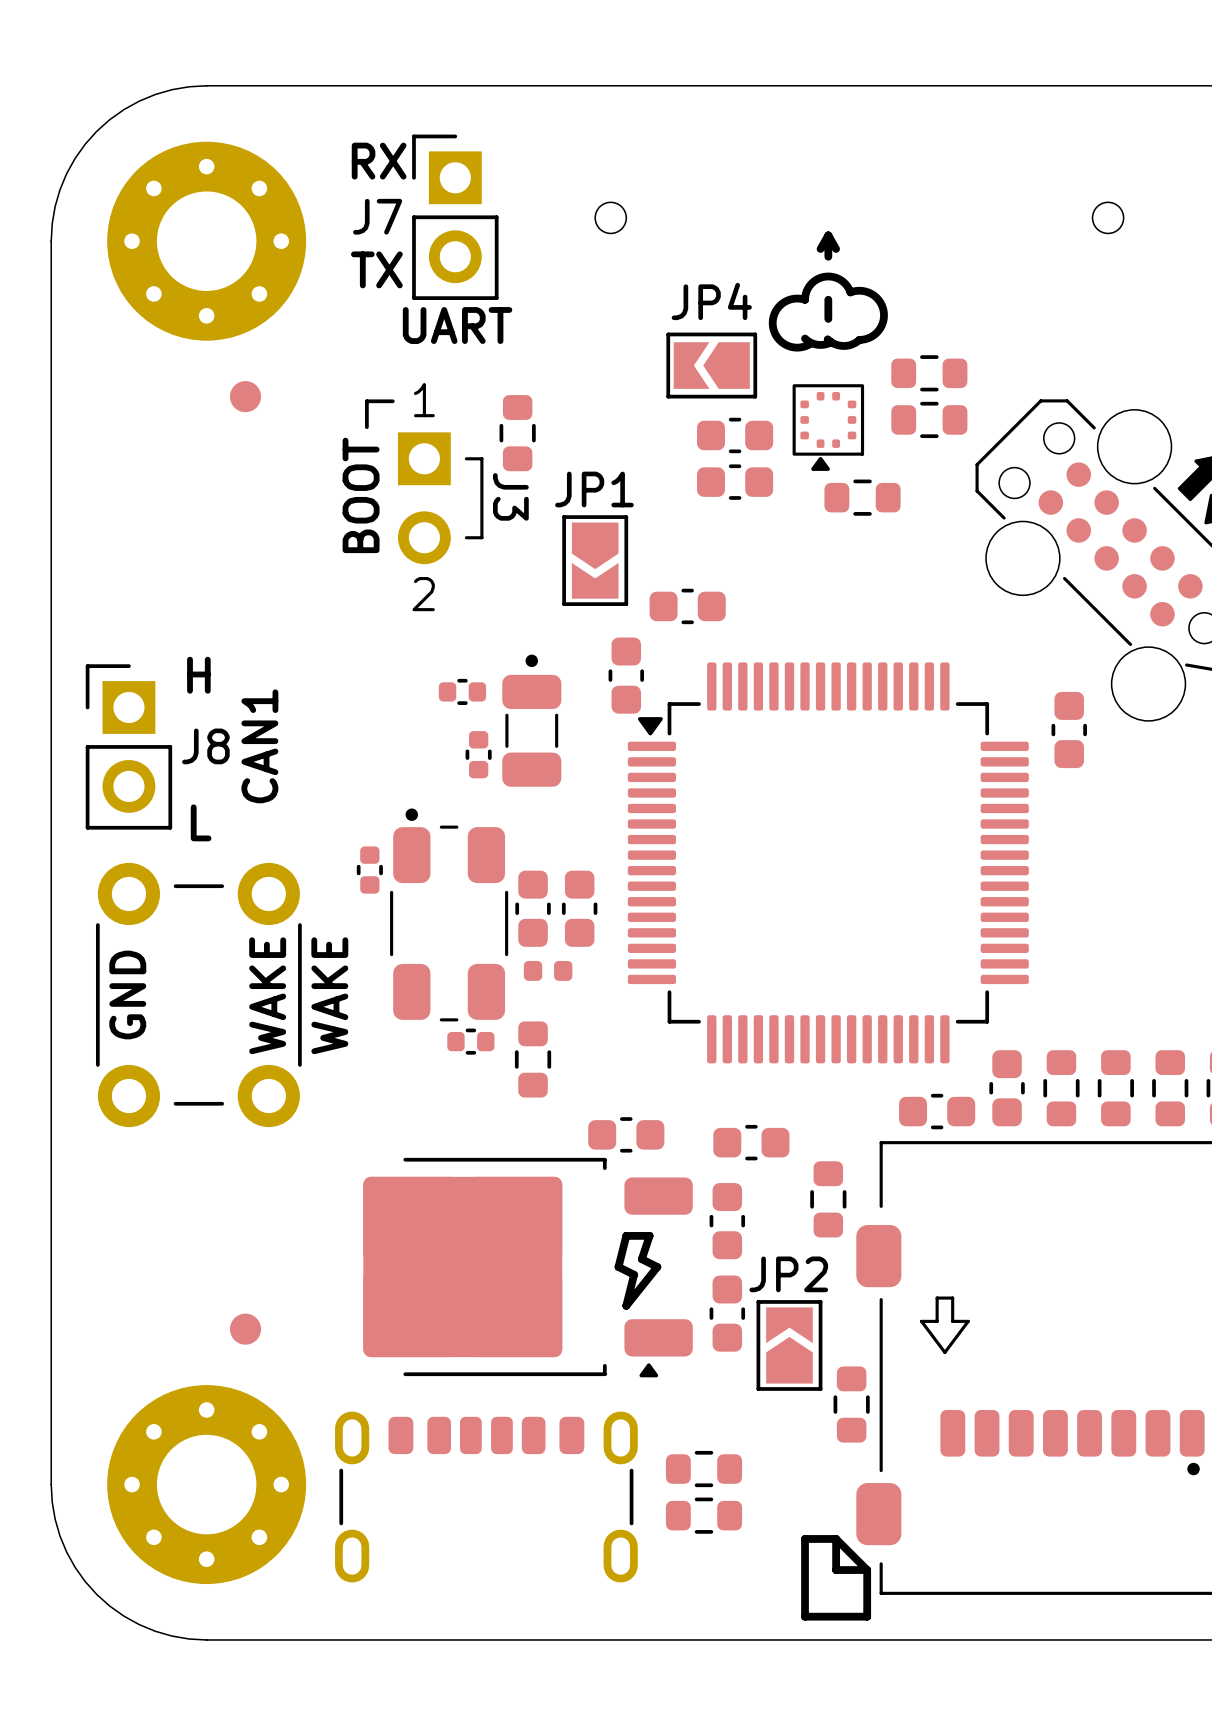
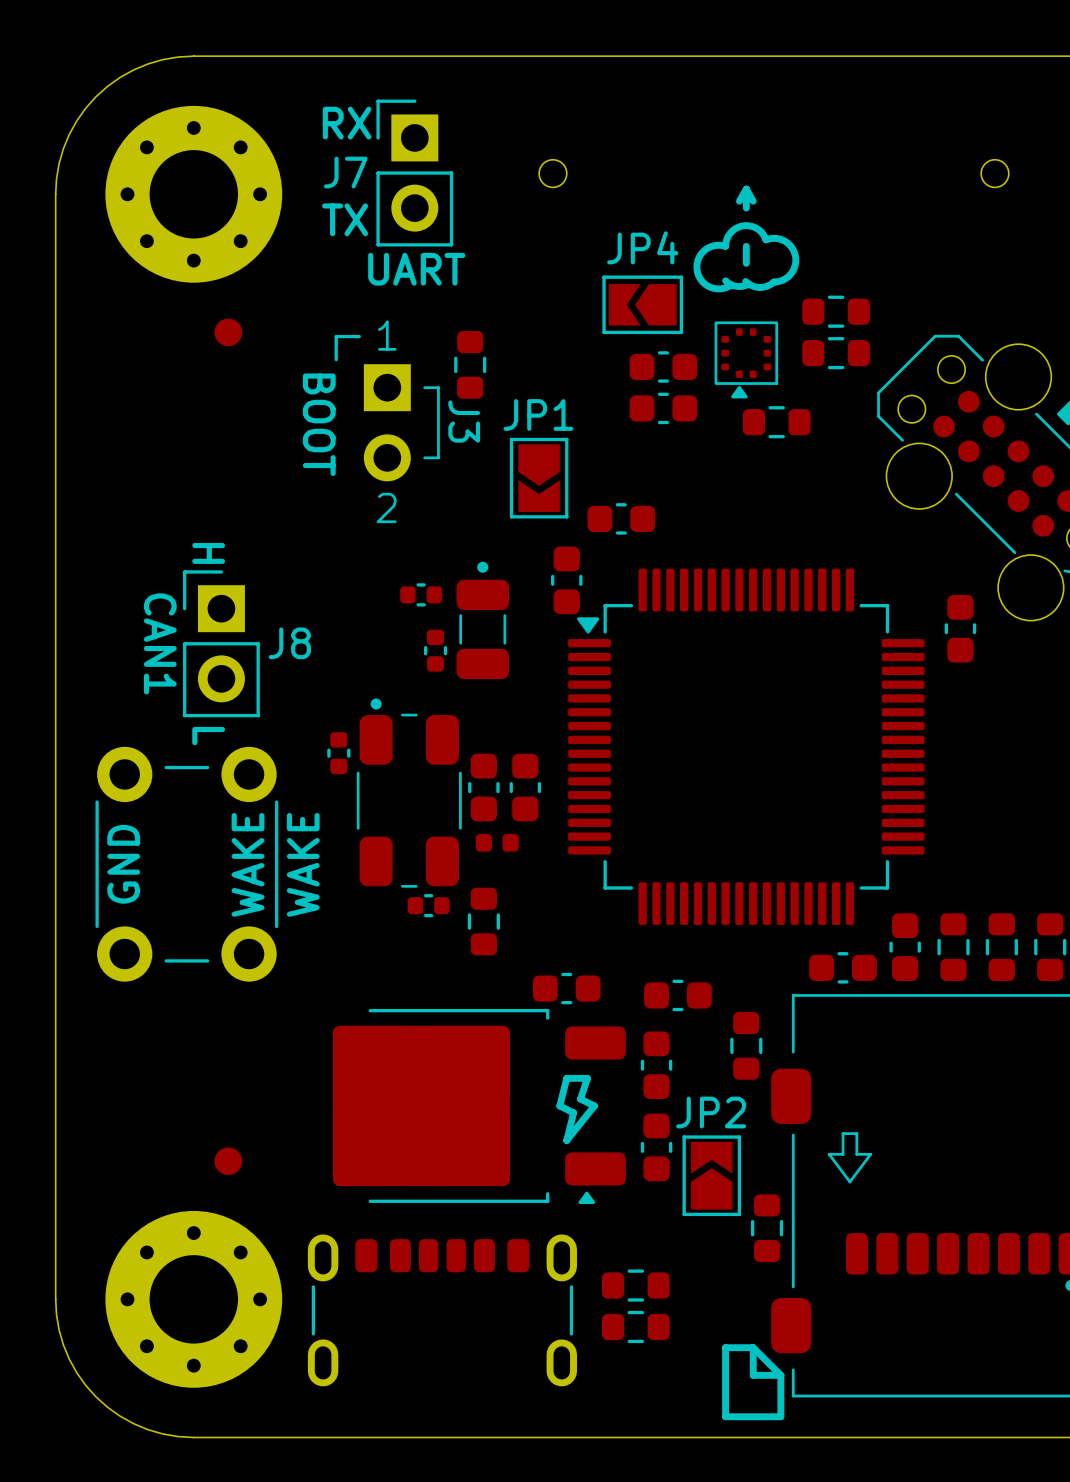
text rotation: 0° (361, 495) -> 180° (319, 424)
text rotation: 0° (198, 675) -> 90° clockwise (208, 553)
J8 position: (128, 746) -> (221, 643)
text rotation: 0° (259, 746) -> 180° (160, 643)
text rotation: 0° (201, 822) -> 90° clockwise (208, 736)

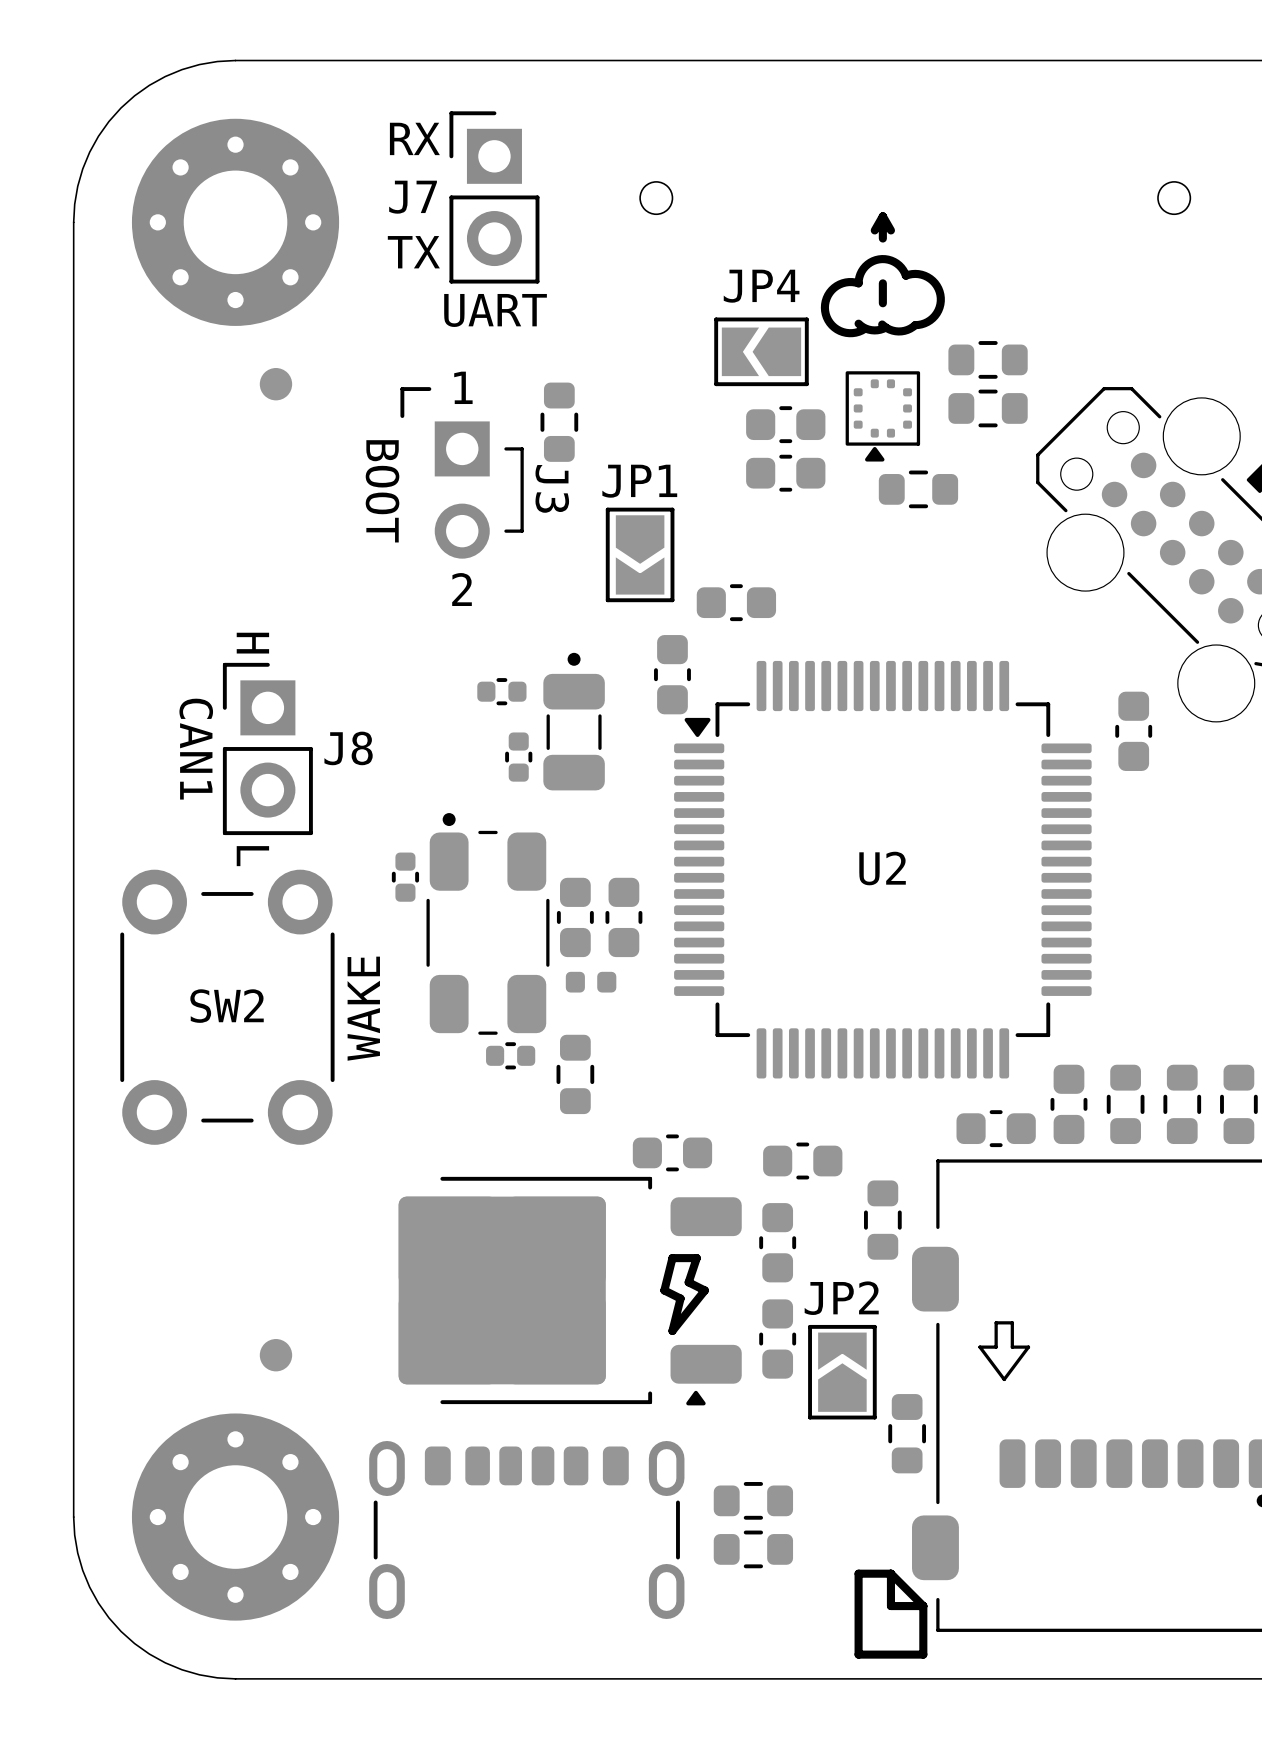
U2 name: none -> U2 (882, 868)
SW2 name: none -> SW2 (227, 1006)
text: GND (123, 864) -> none
text: WAKE (248, 864) -> none

